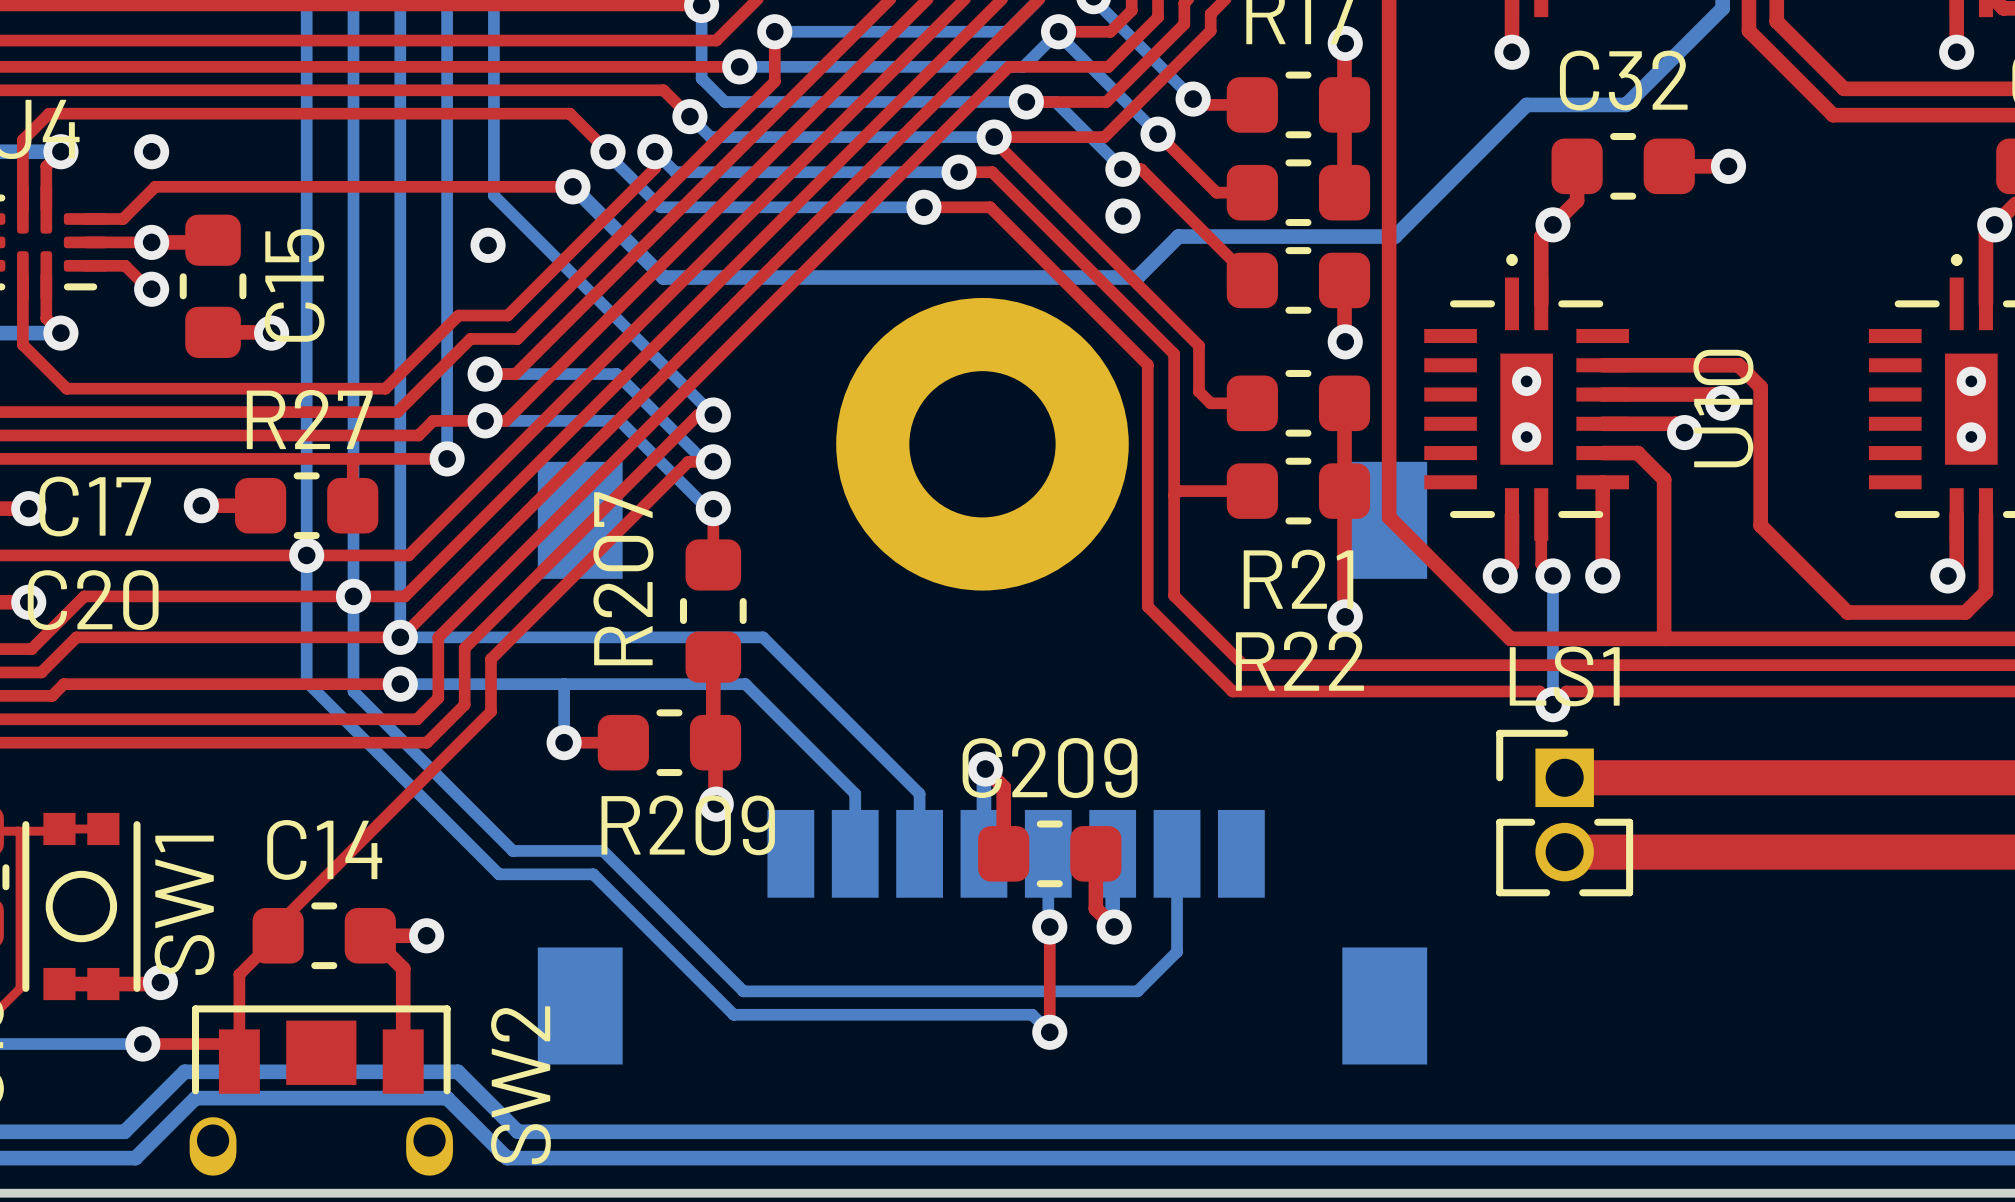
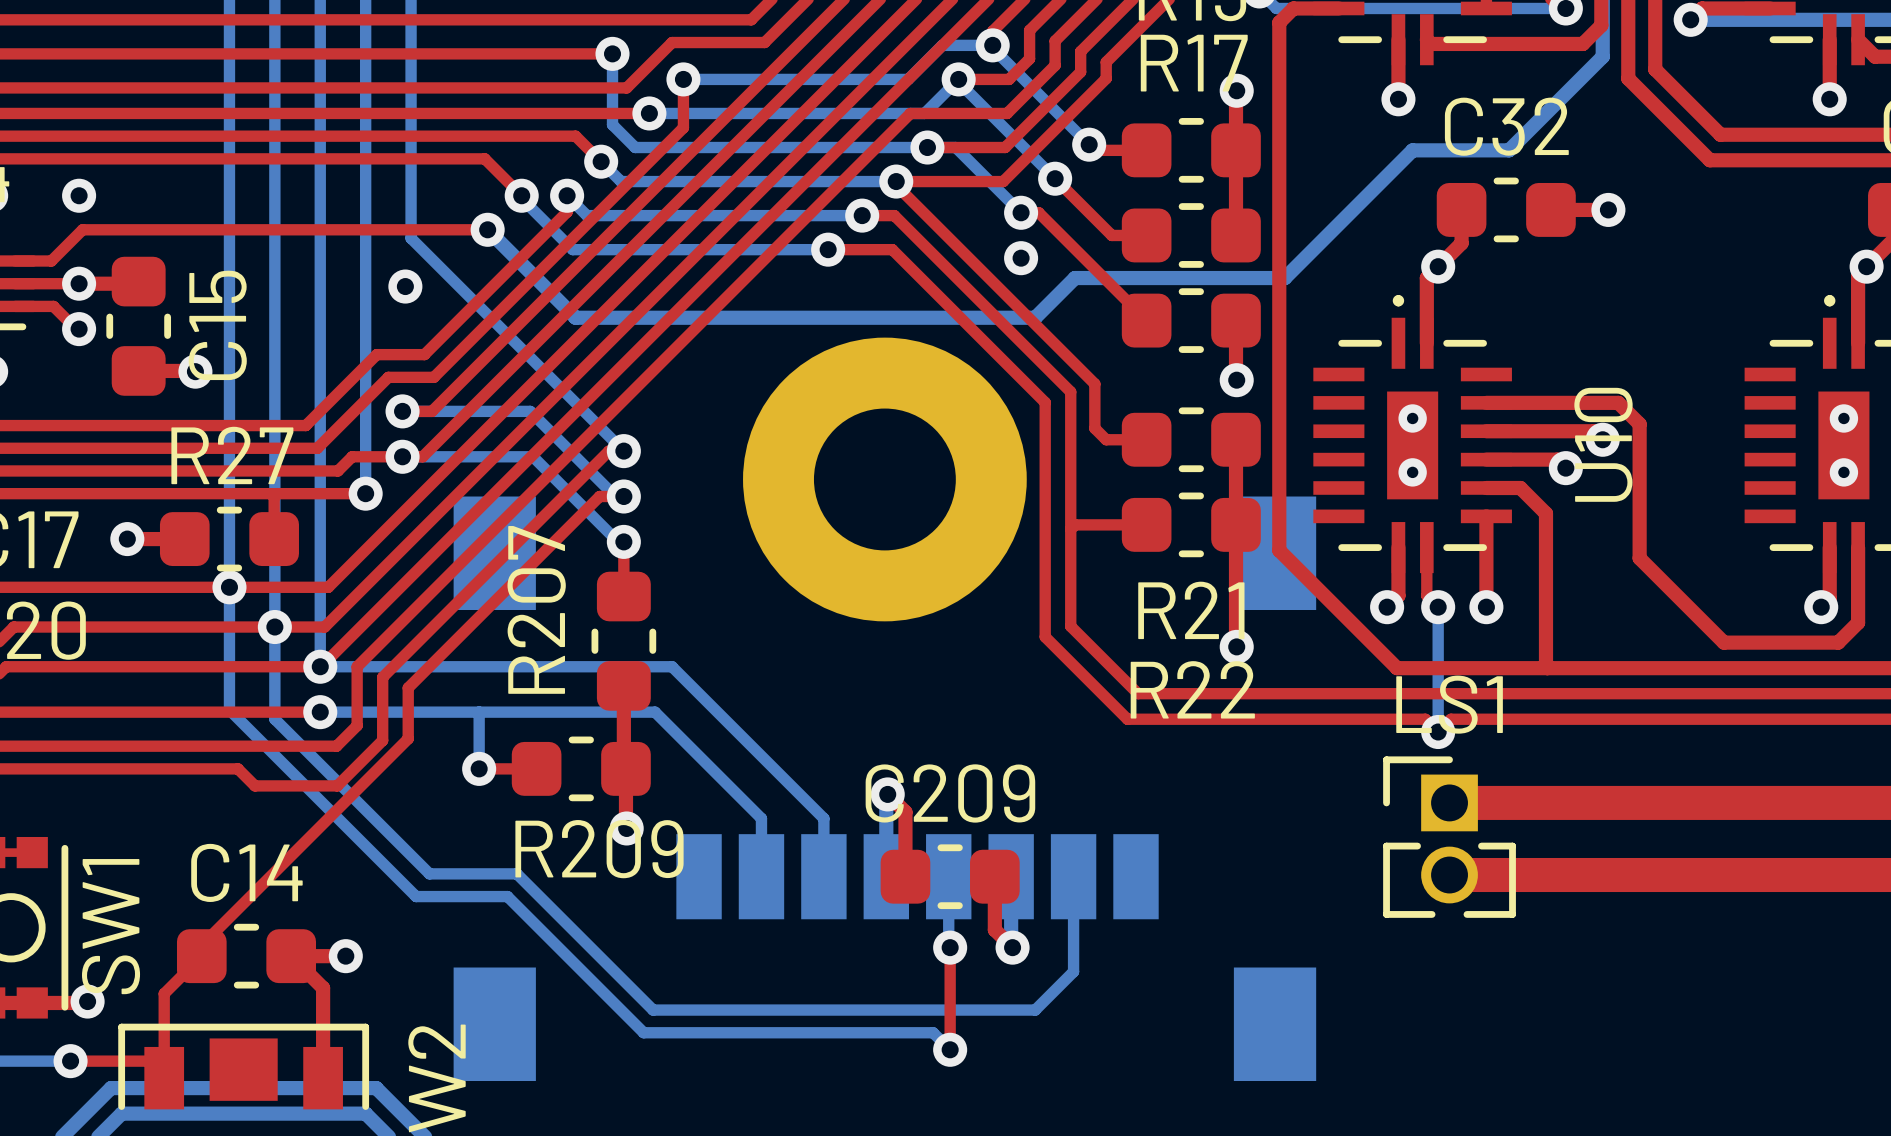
top track: (464, 704) (426, 742) (315, 742) -> (382, 732) (382, 740) (337, 785) (255, 785) (237, 768)

